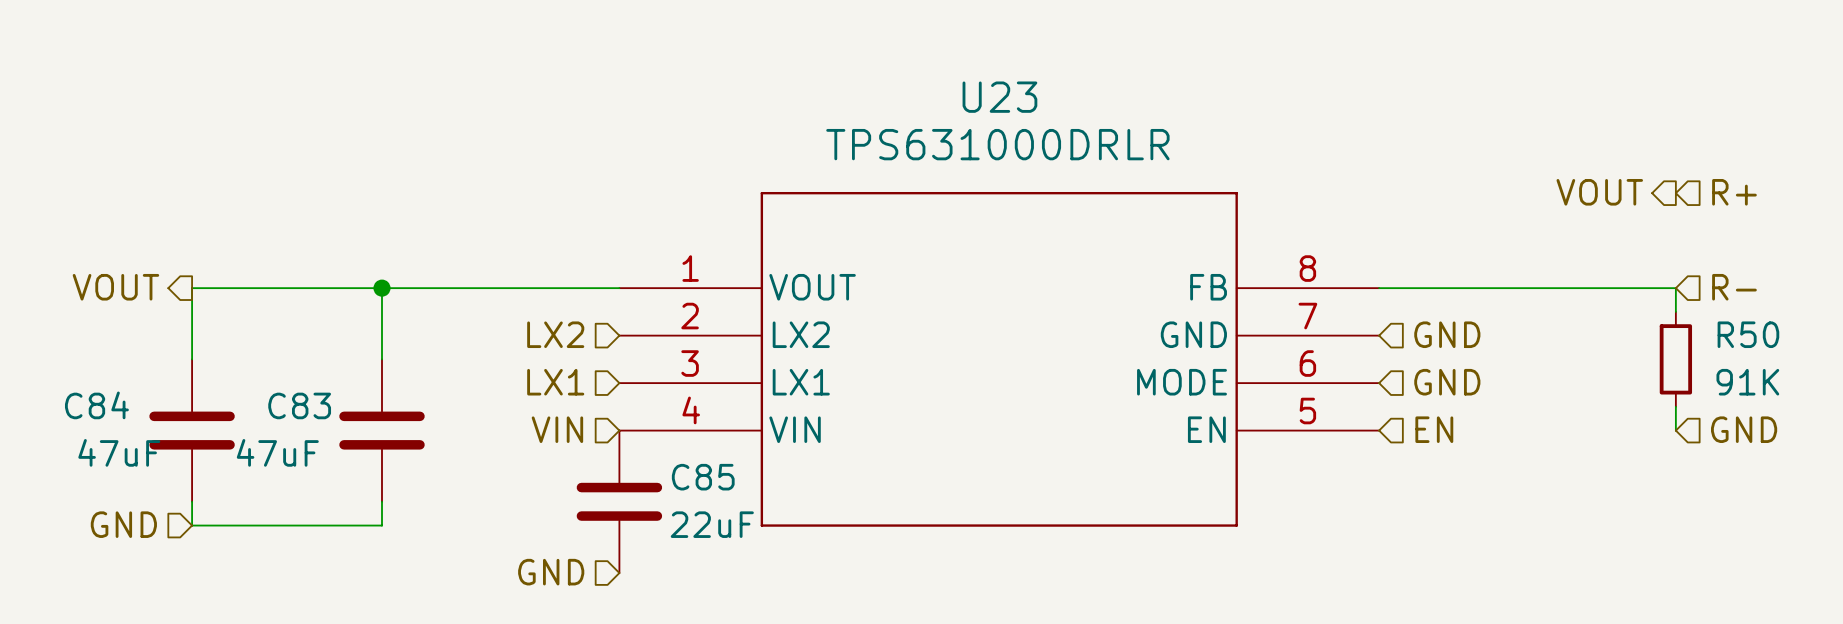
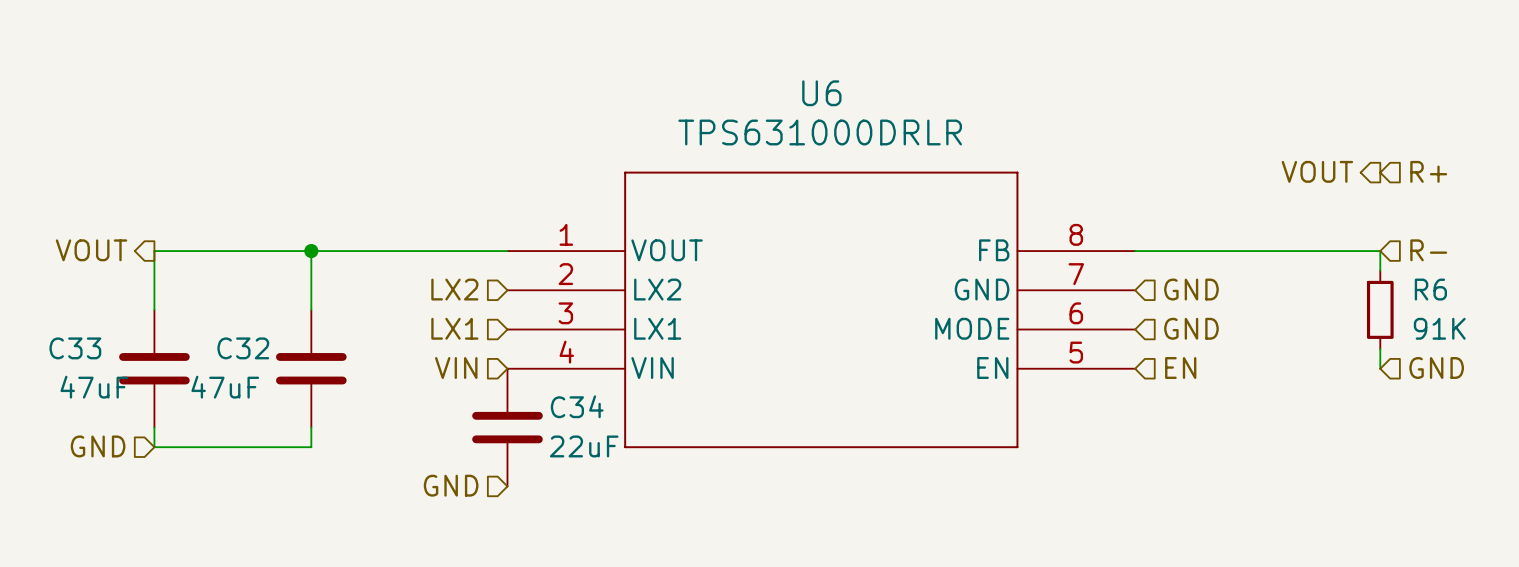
U23 name: U23 (999, 97) -> U6 (821, 93)
R50 name: R50 (1748, 334) -> R6 (1430, 289)
C84 name: C84 (96, 405) -> C33 (75, 348)
C83 name: C83 (299, 405) -> C32 (243, 348)
C85 name: C85 (703, 477) -> C34 (577, 406)

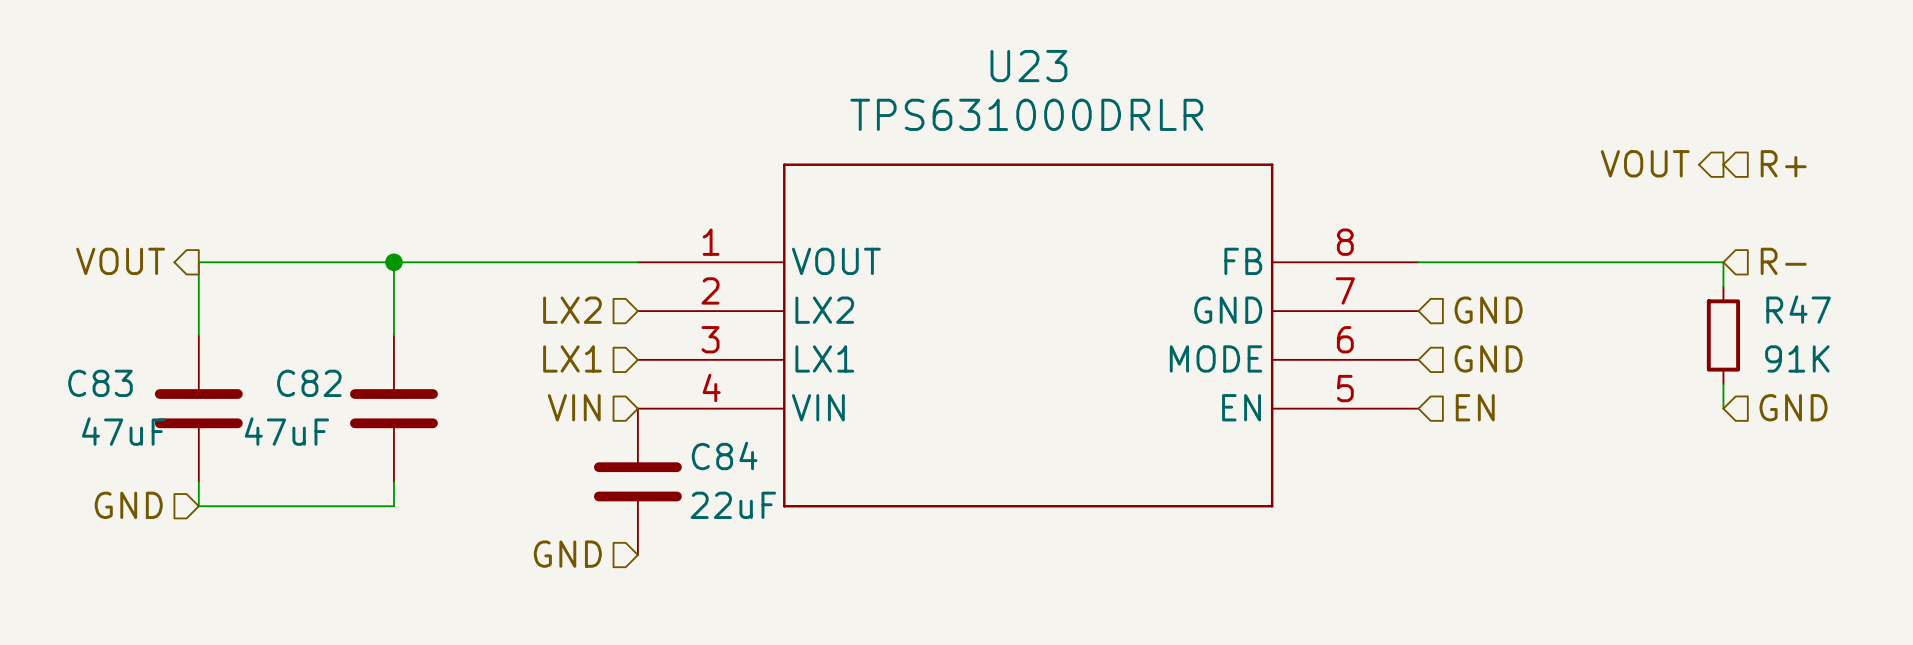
U6 name: U6 (821, 93) -> U23 (1028, 66)
R6 name: R6 (1430, 289) -> R47 (1798, 309)
C33 name: C33 (75, 348) -> C83 (100, 383)
C32 name: C32 (243, 348) -> C82 (309, 383)
C34 name: C34 (577, 406) -> C84 (724, 455)

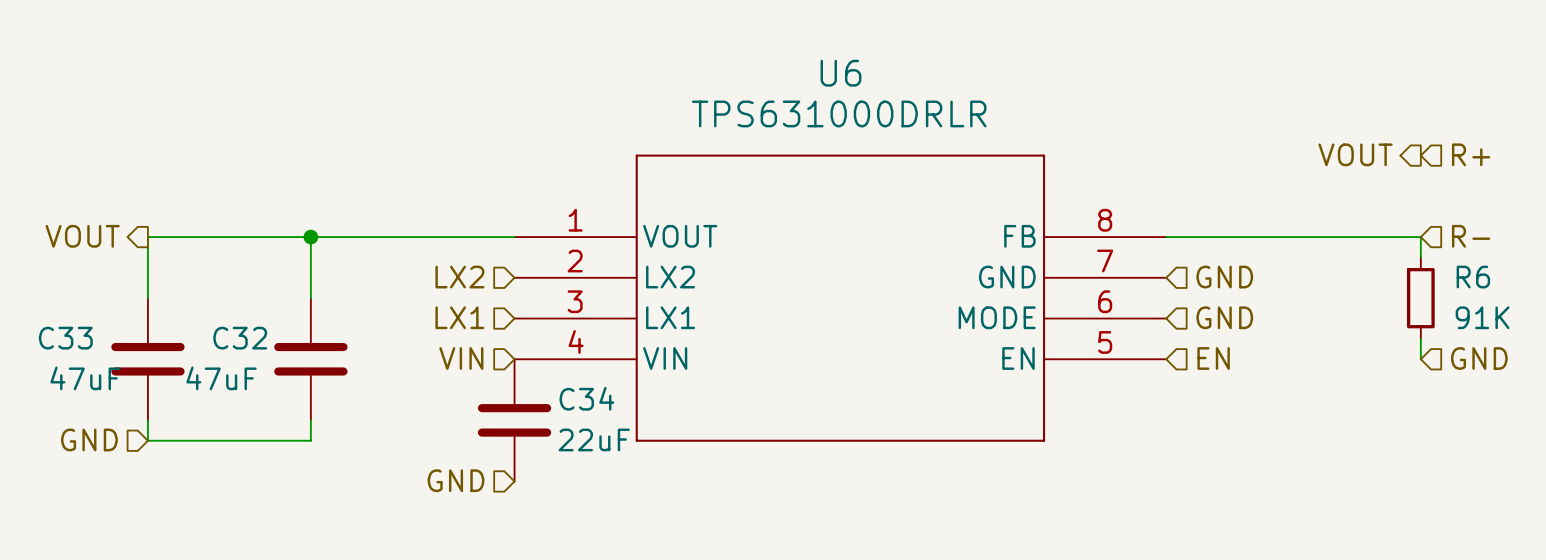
U23 name: U23 (1028, 66) -> U6 (840, 73)
R47 name: R47 (1798, 309) -> R6 (1473, 277)
C83 name: C83 (100, 383) -> C33 (65, 338)
C82 name: C82 (309, 383) -> C32 (240, 338)
C84 name: C84 (724, 455) -> C34 (586, 398)

